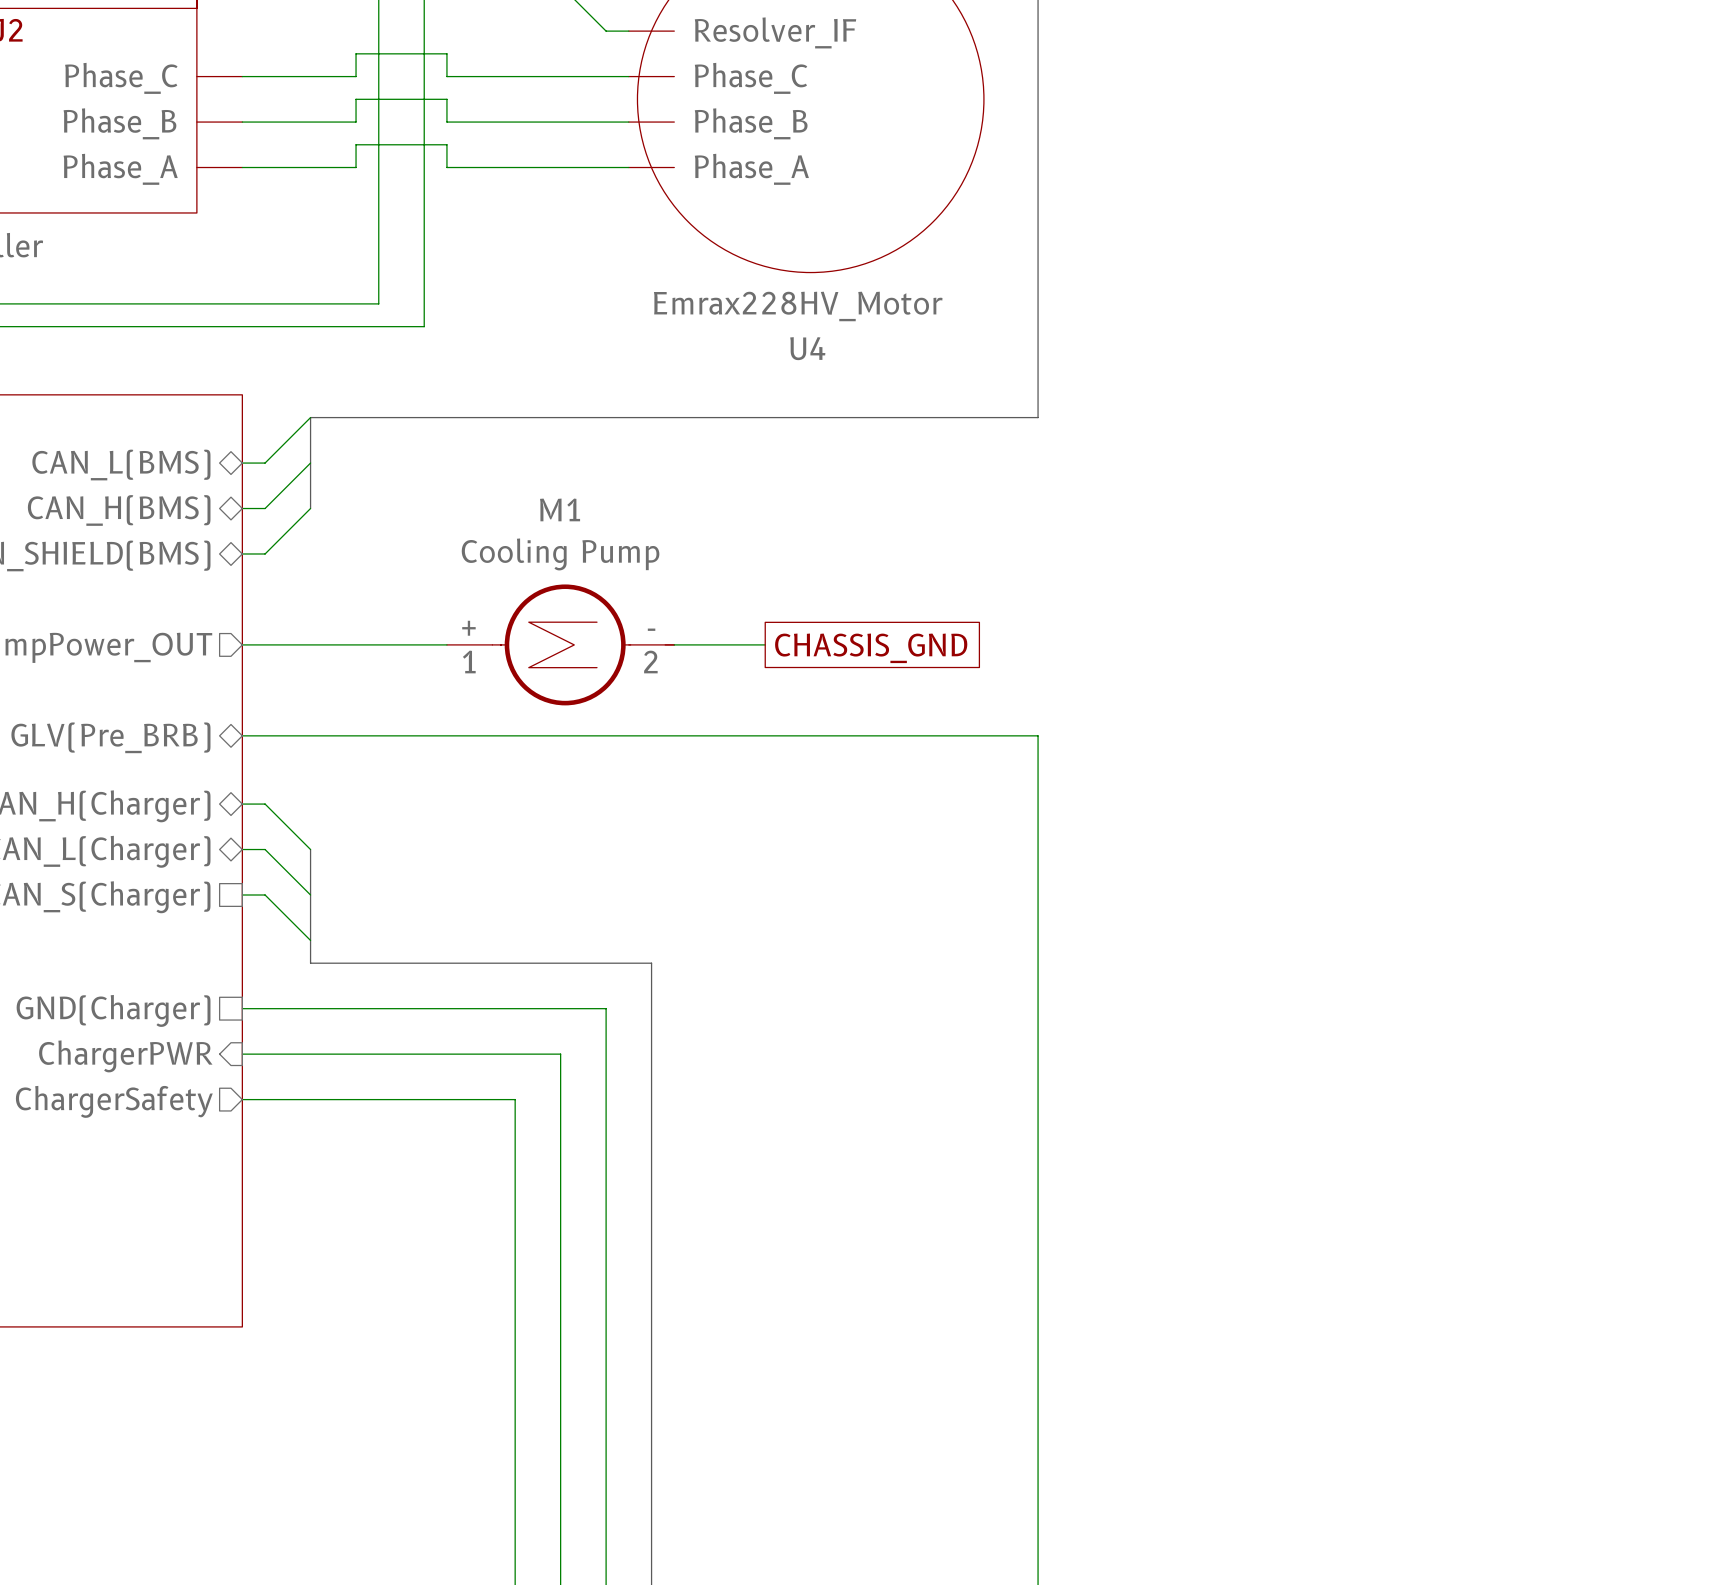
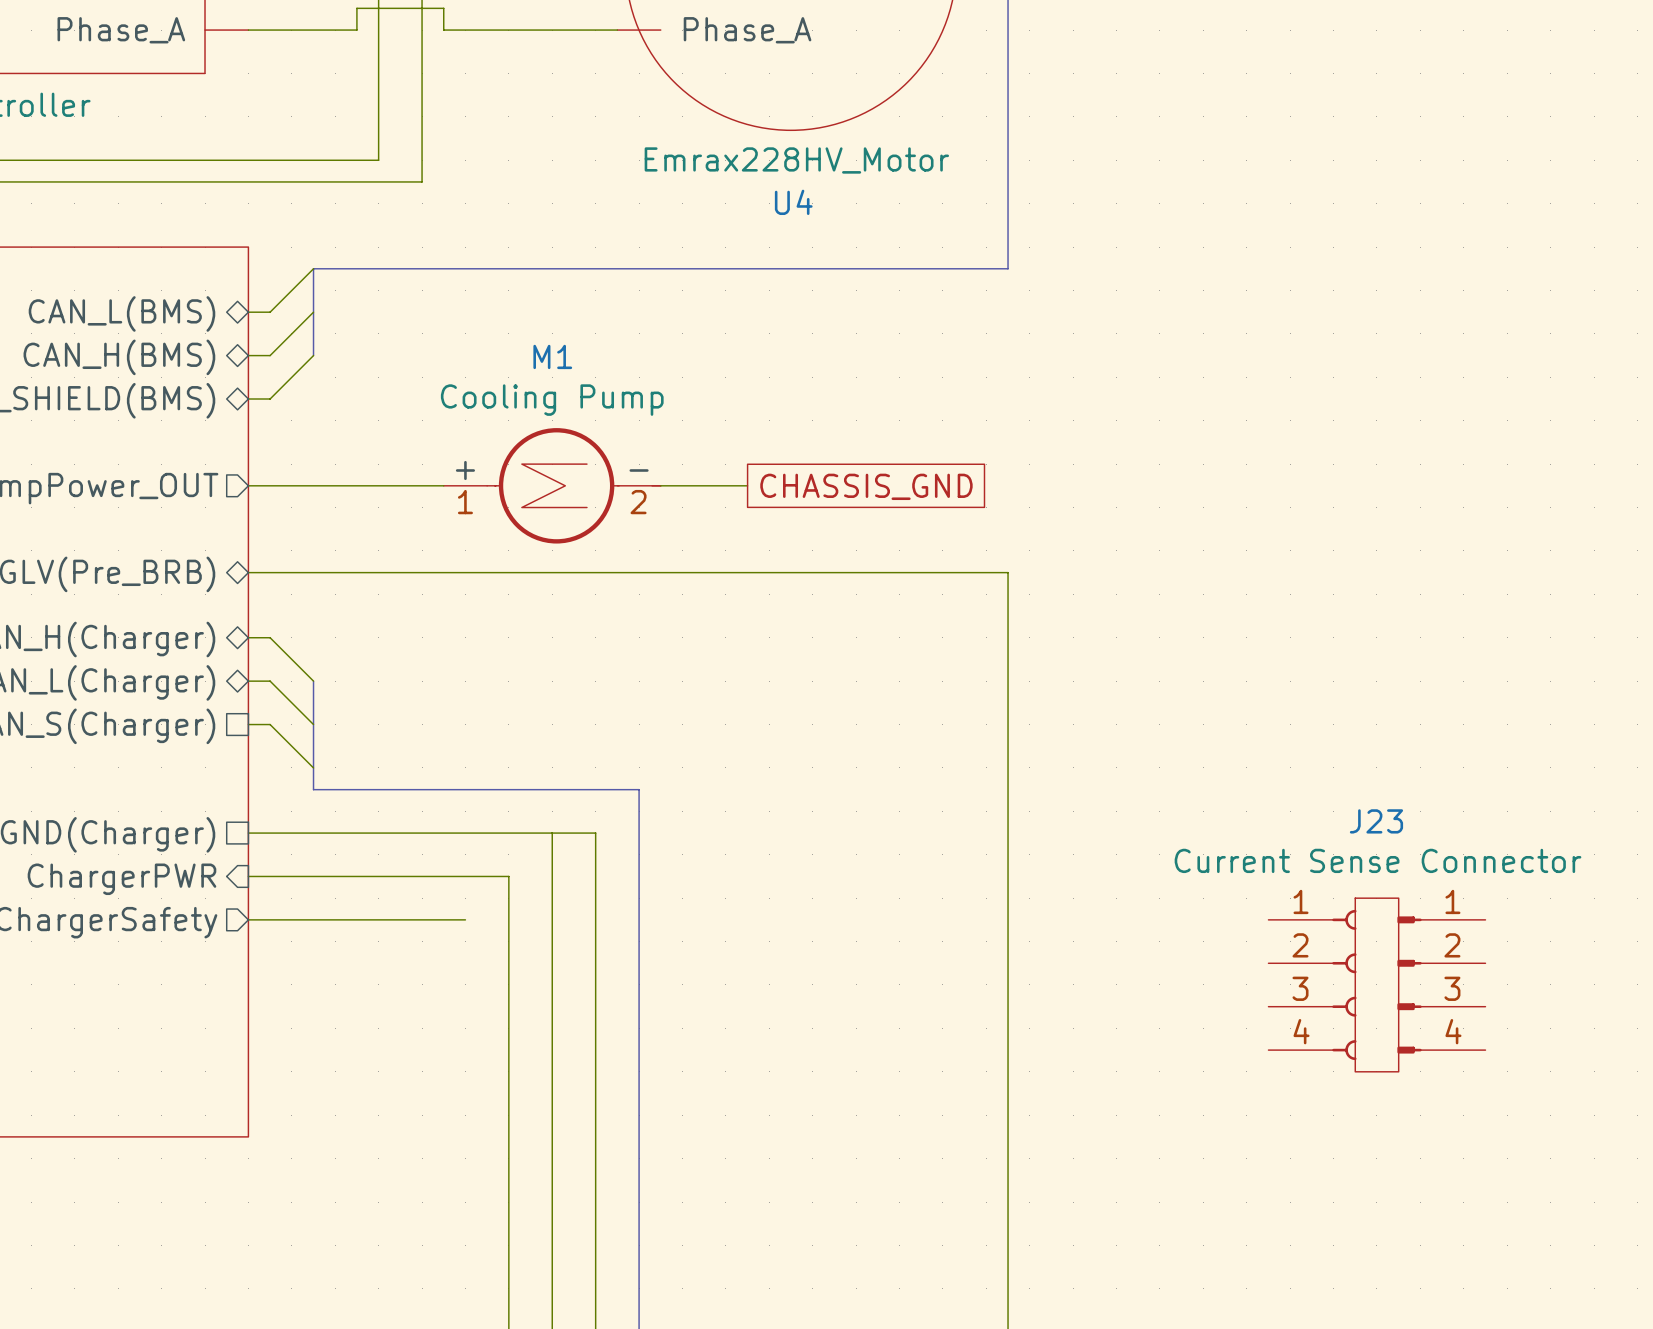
wire: (515, 1054) (560, 1054) -> (552, 833) (552, 876)
wire: (469, 1099) (515, 1099) -> (508, 876) (508, 919)
J23: none -> Current Sense Connector (1376, 984)

